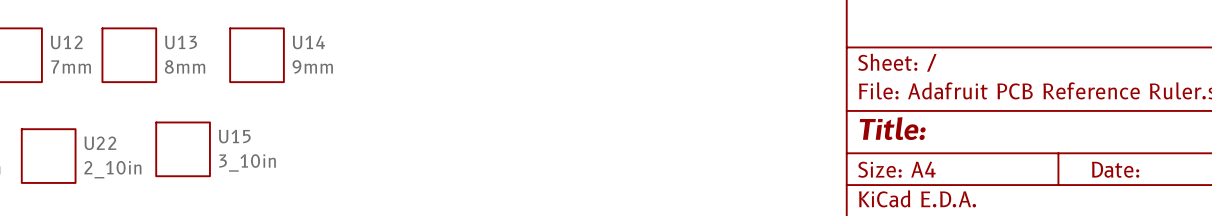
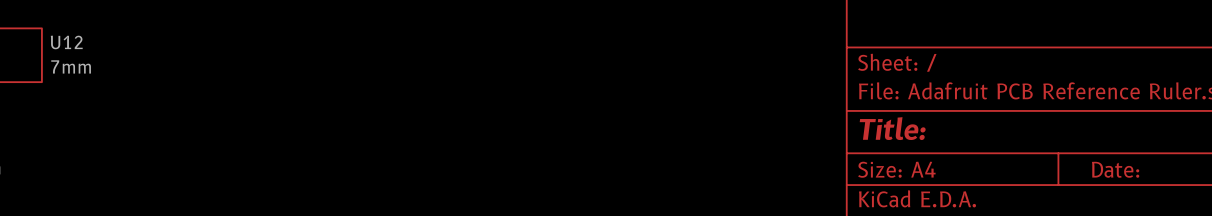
U13: 8mm (129, 55) -> none
U14: 9mm (257, 55) -> none
U15: 3_10in (183, 149) -> none
U22: 2_10in (48, 156) -> none

